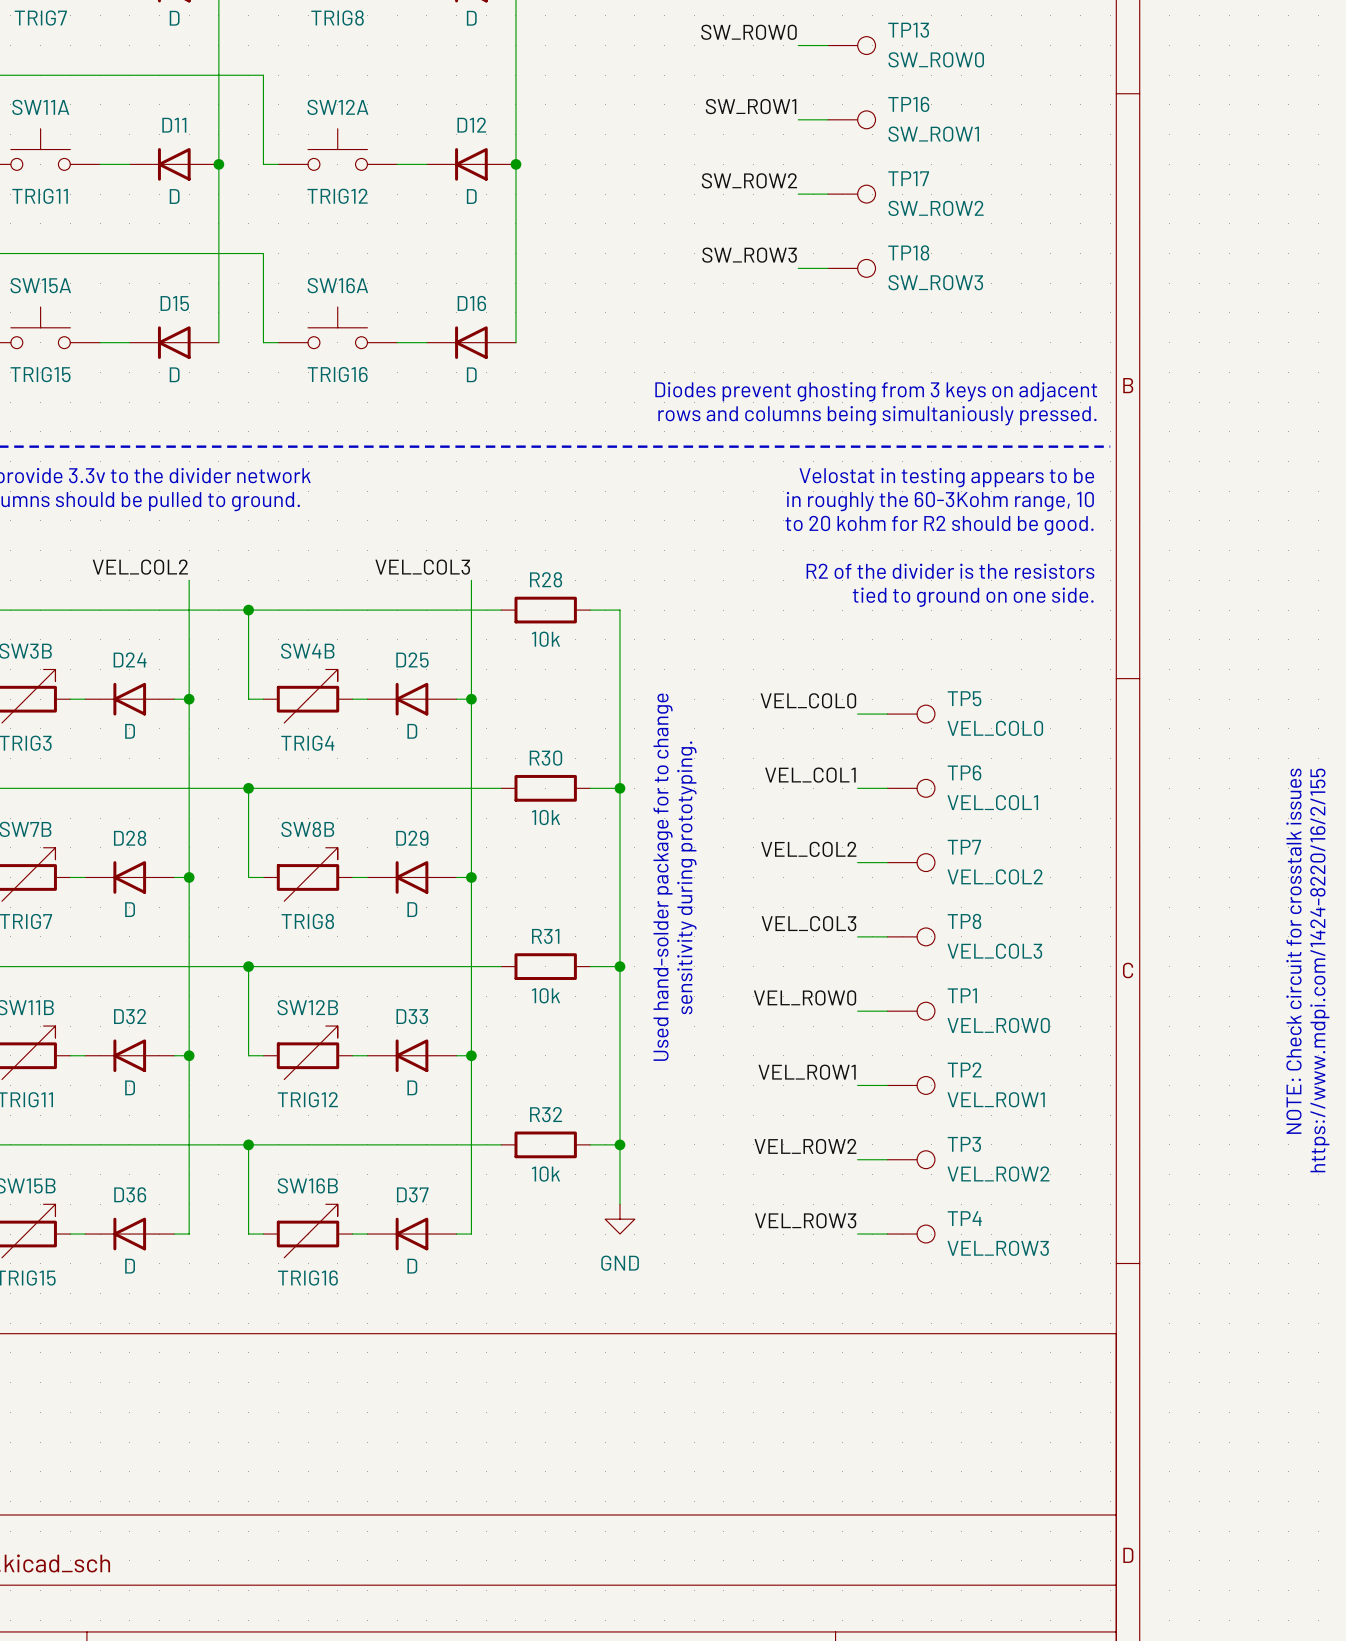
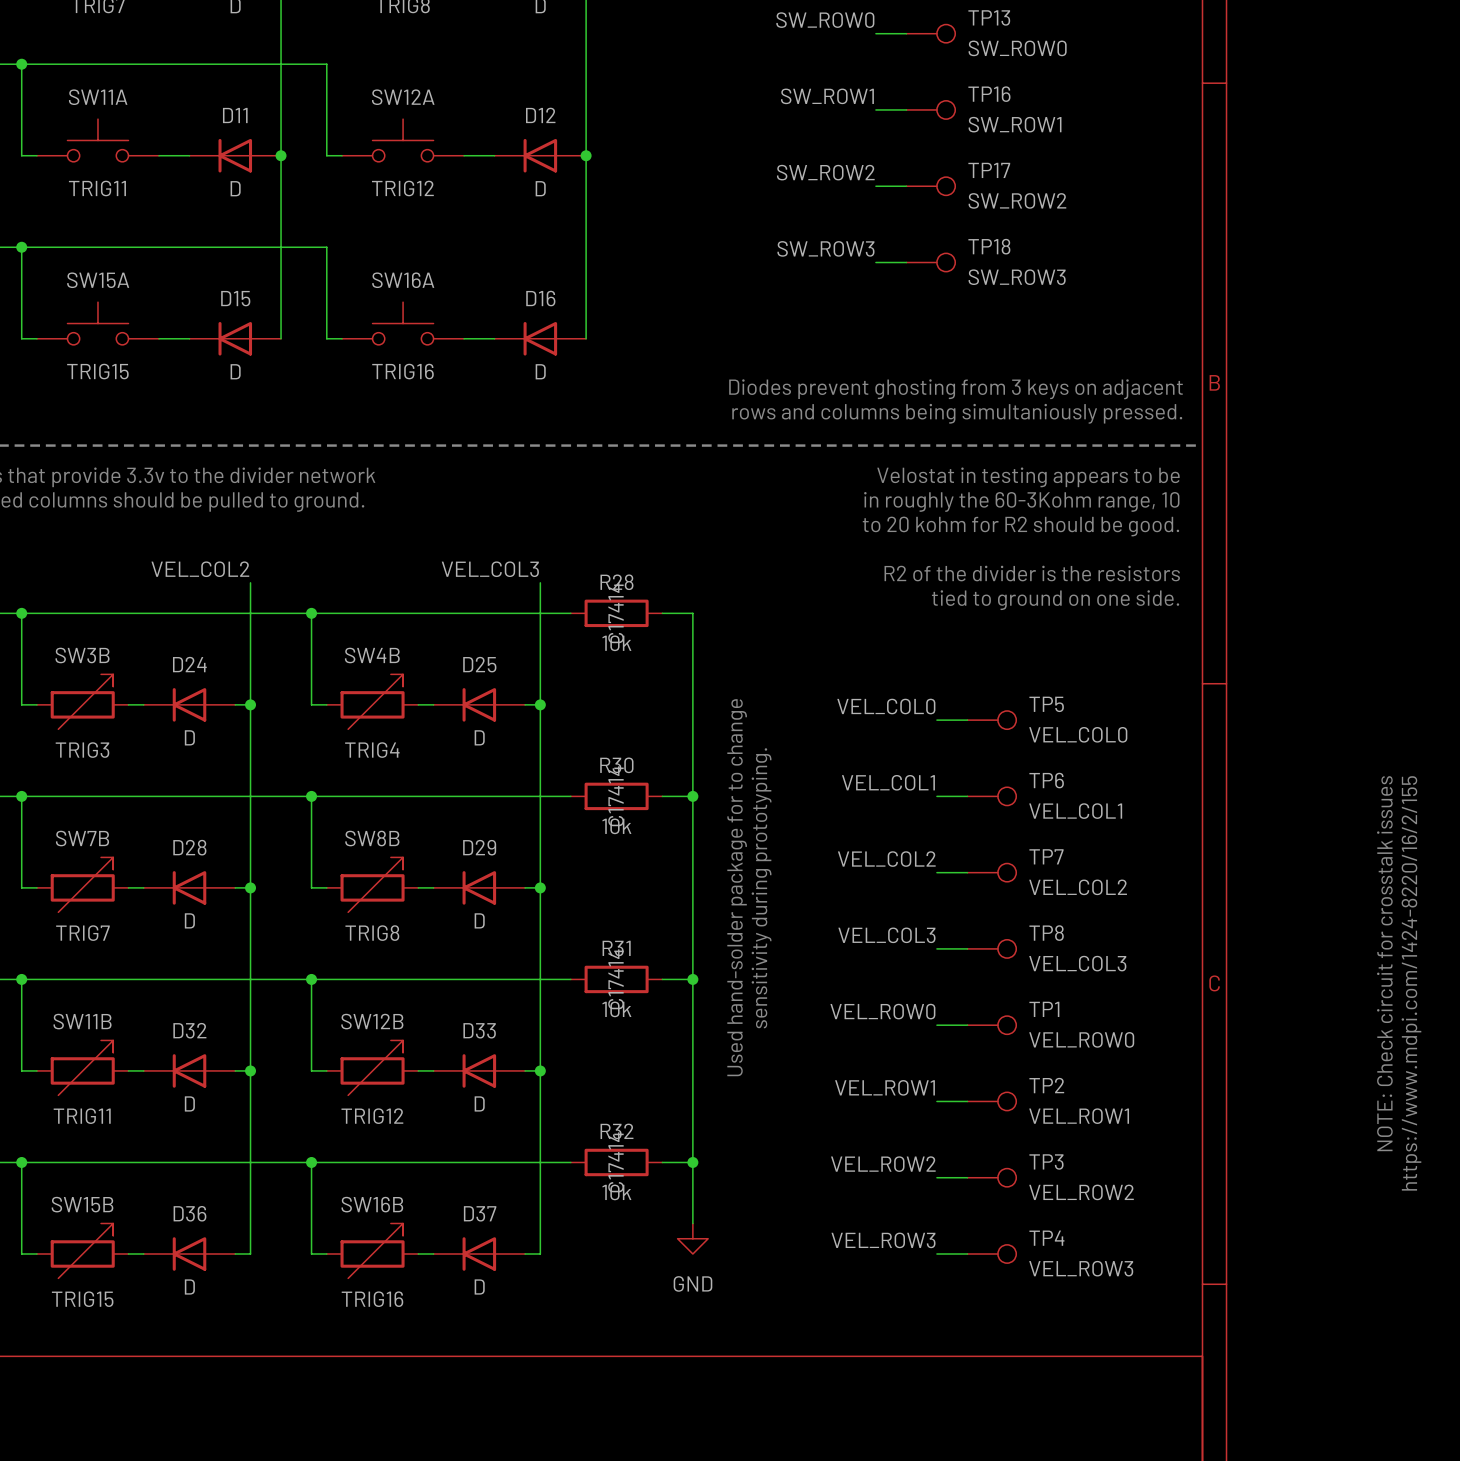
R28 text: none -> C17414 (616, 613)
R30 text: none -> C17414 (616, 796)
R31 text: none -> C17414 (616, 979)
R32 text: none -> C17414 (616, 1162)

